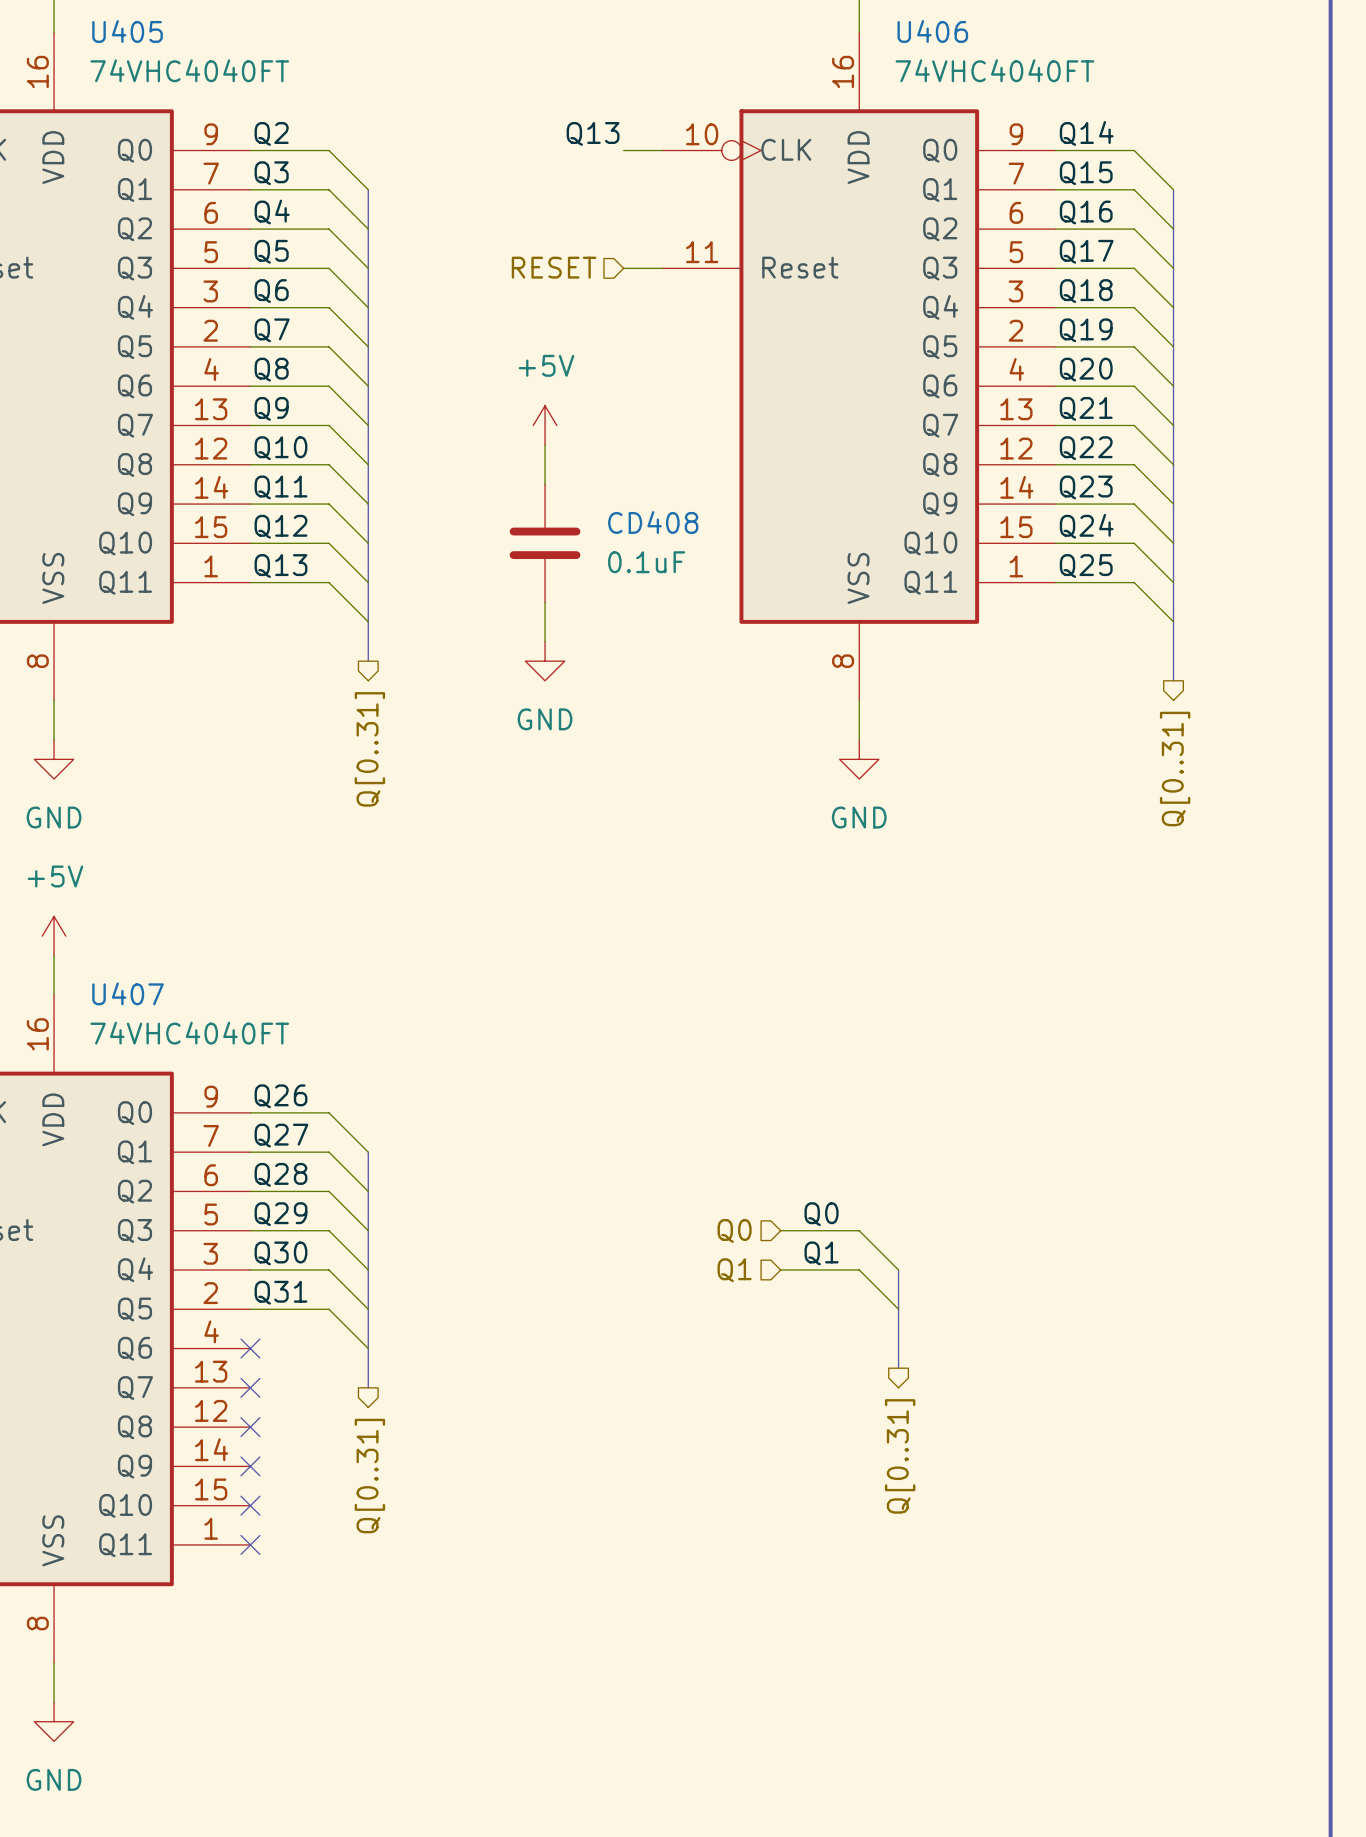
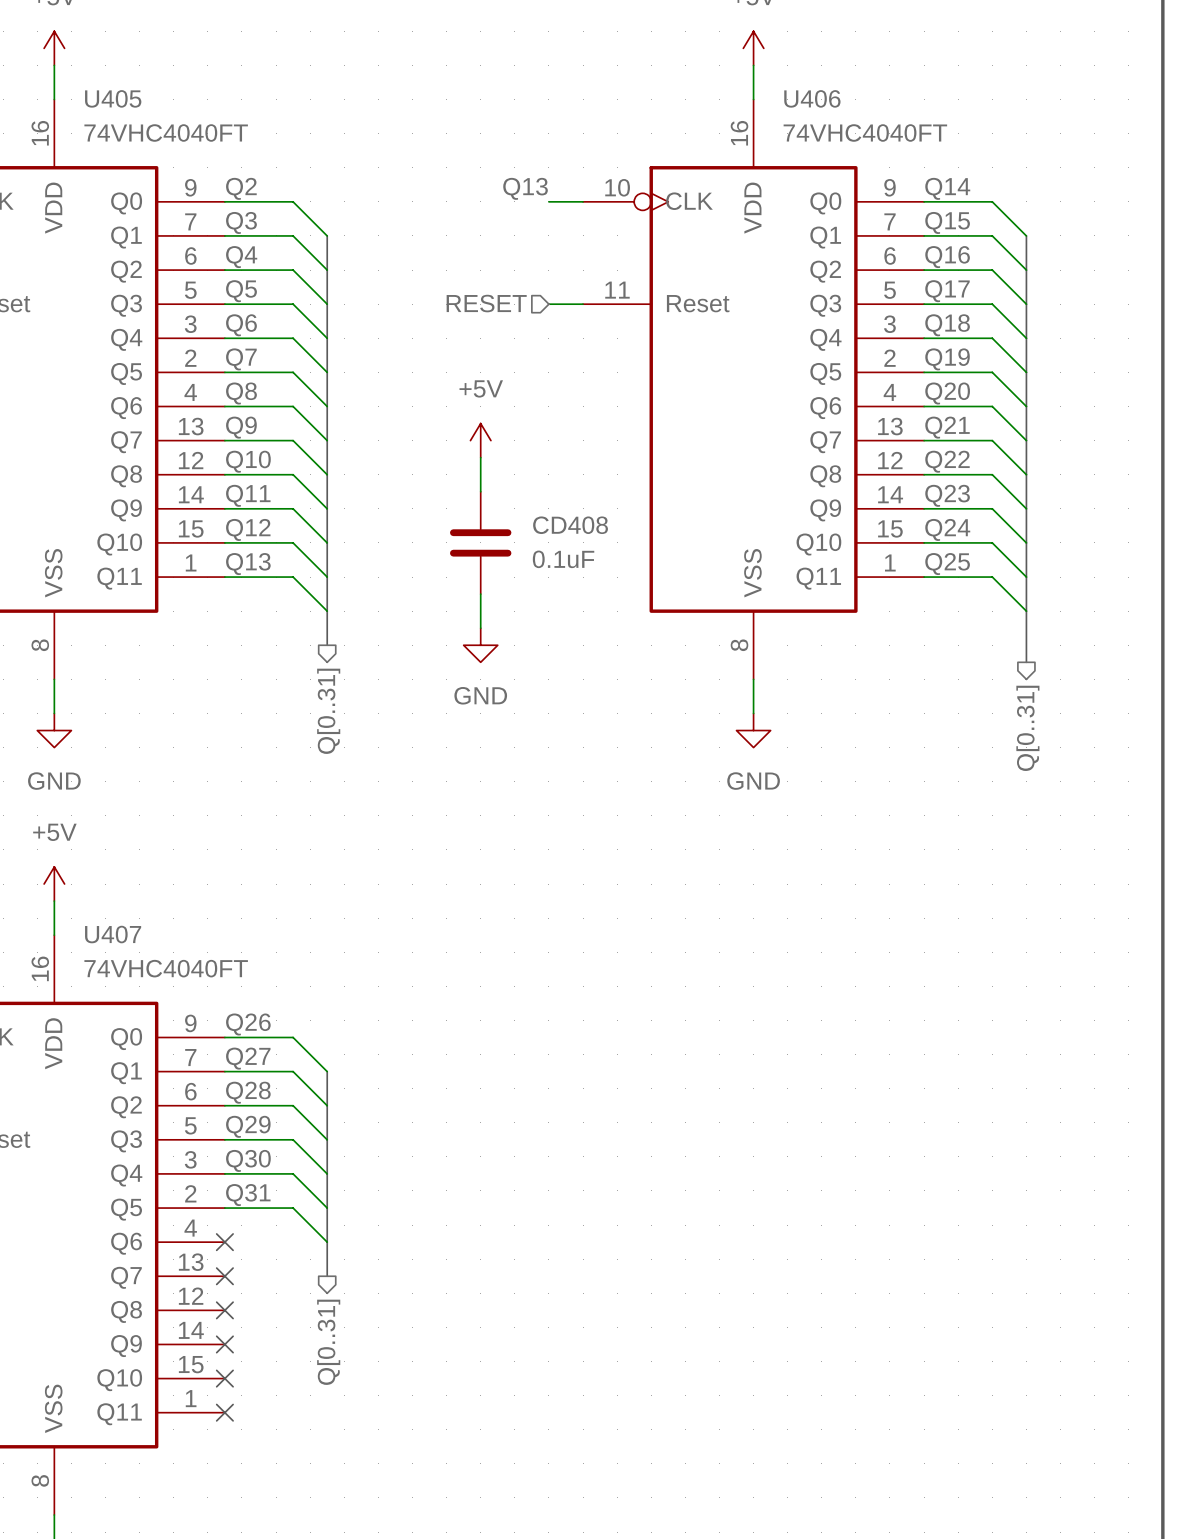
label: Q0 (821, 1214) -> none
hierarchical label: Q0 (734, 1230) -> none
wire: (780, 1230) (859, 1230) (898, 1270) -> none
label: Q1 (821, 1253) -> none
hierarchical label: Q1 (734, 1270) -> none
wire: (780, 1270) (859, 1270) (898, 1309) -> none
bus: (898, 1270) (898, 1368) -> none
hierarchical label: Q[0..31] (900, 1456) -> none

